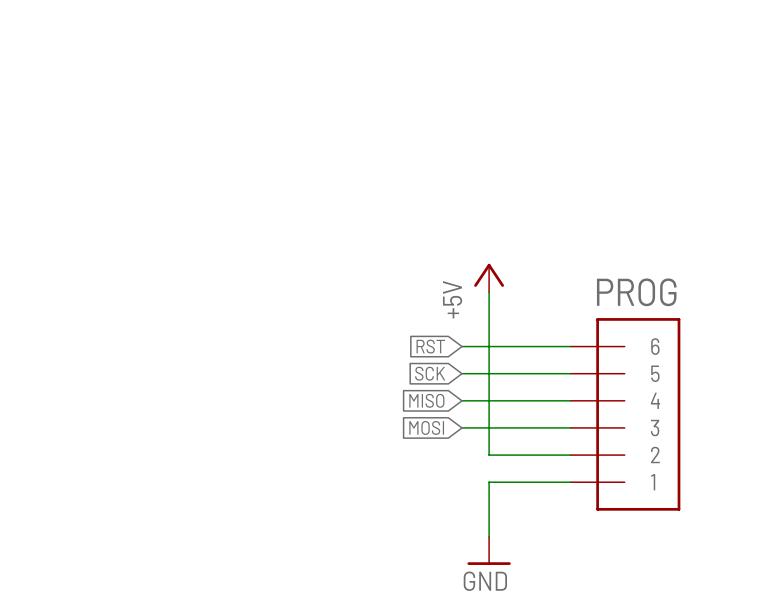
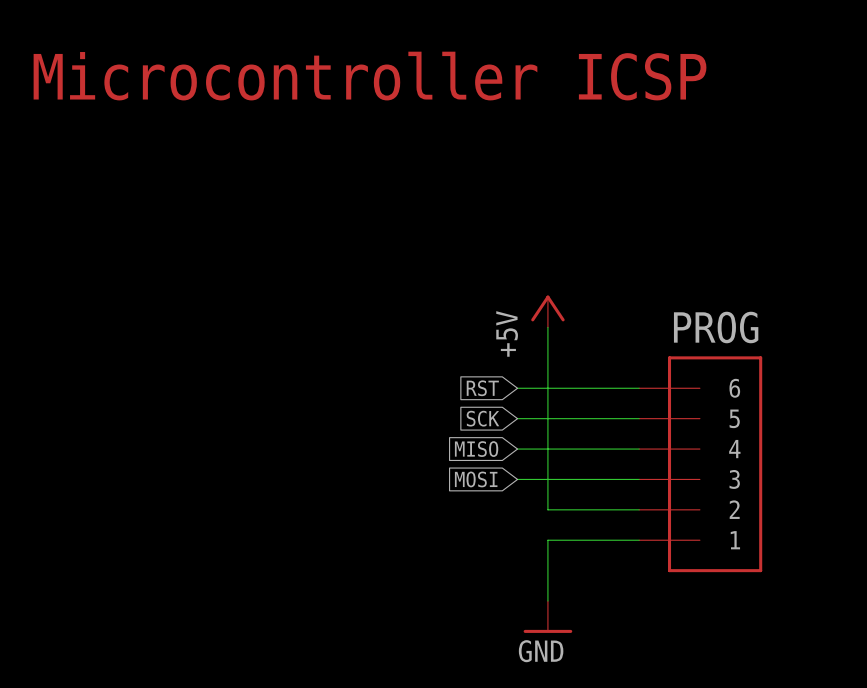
text: none -> Microcontroller ICSP (370, 76)

